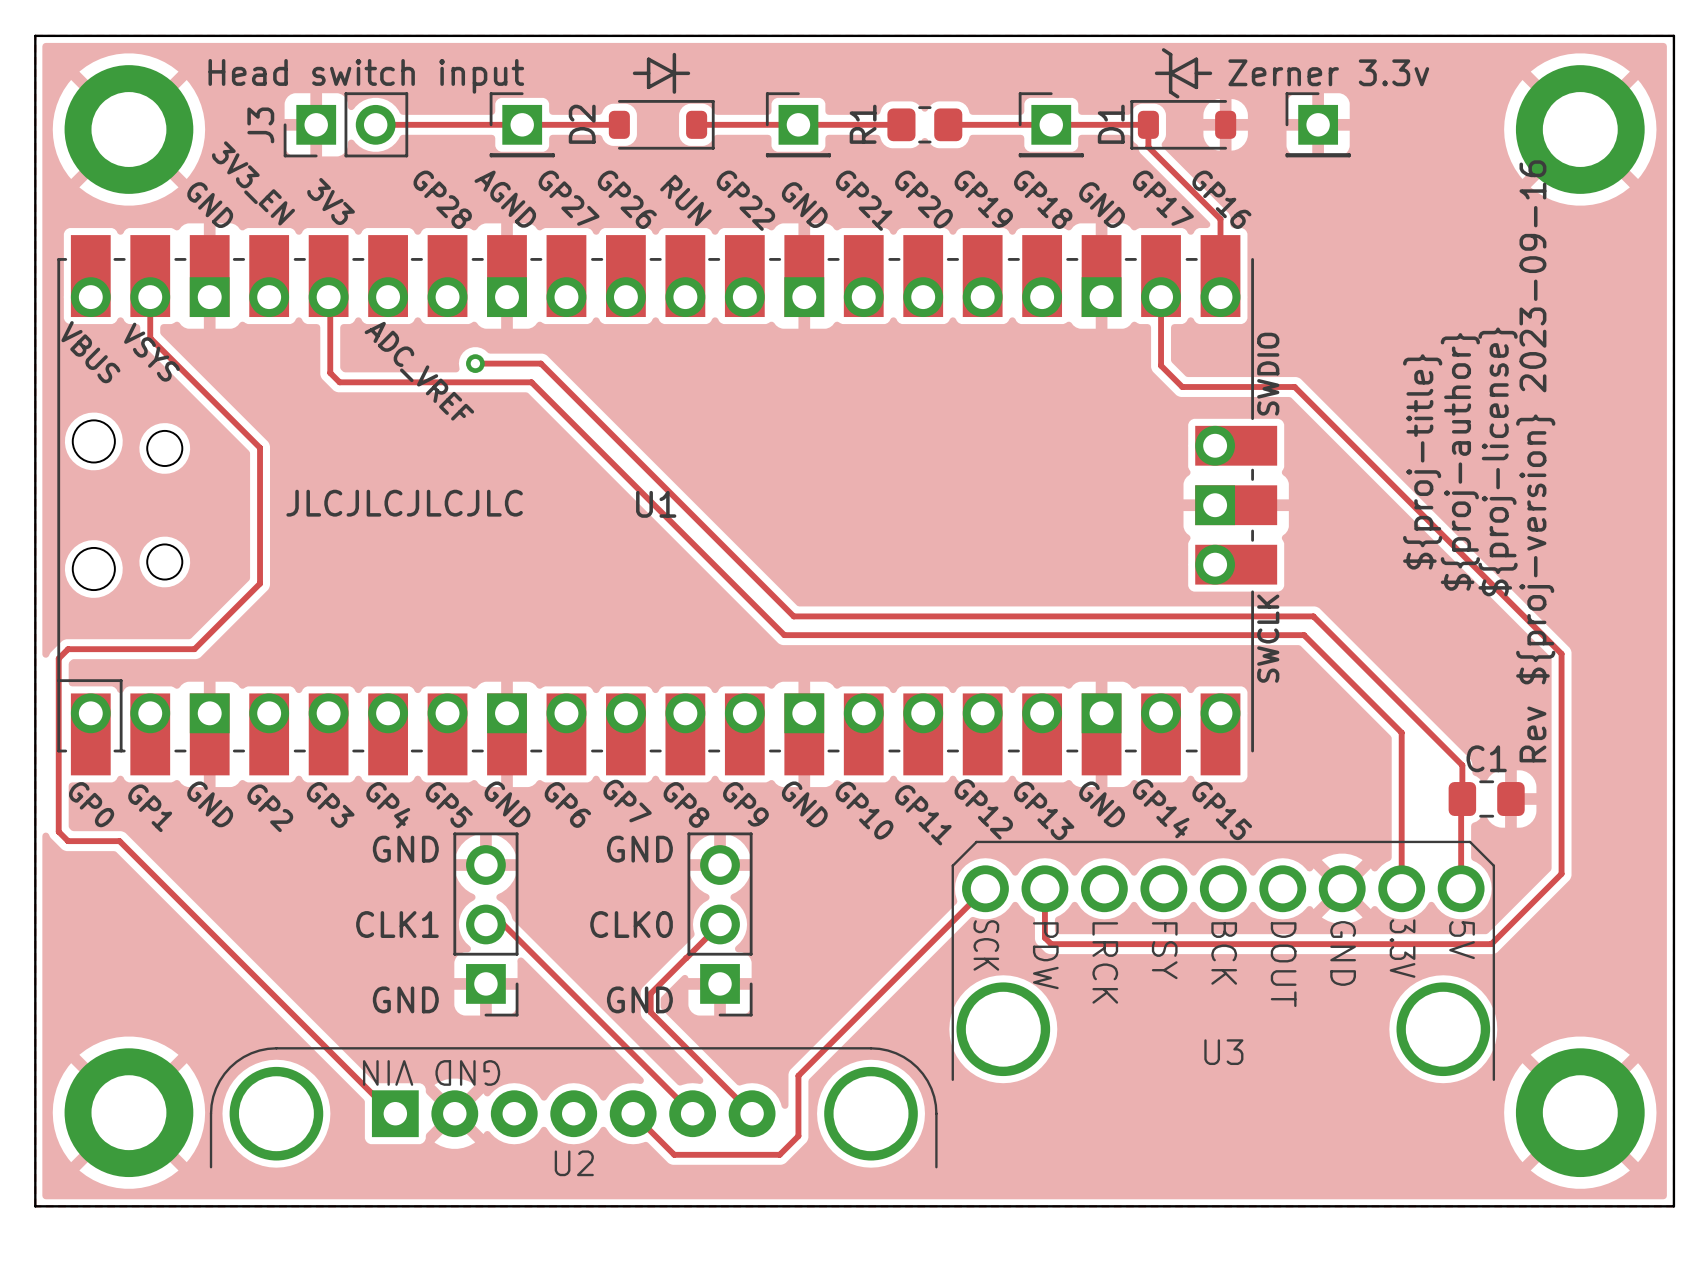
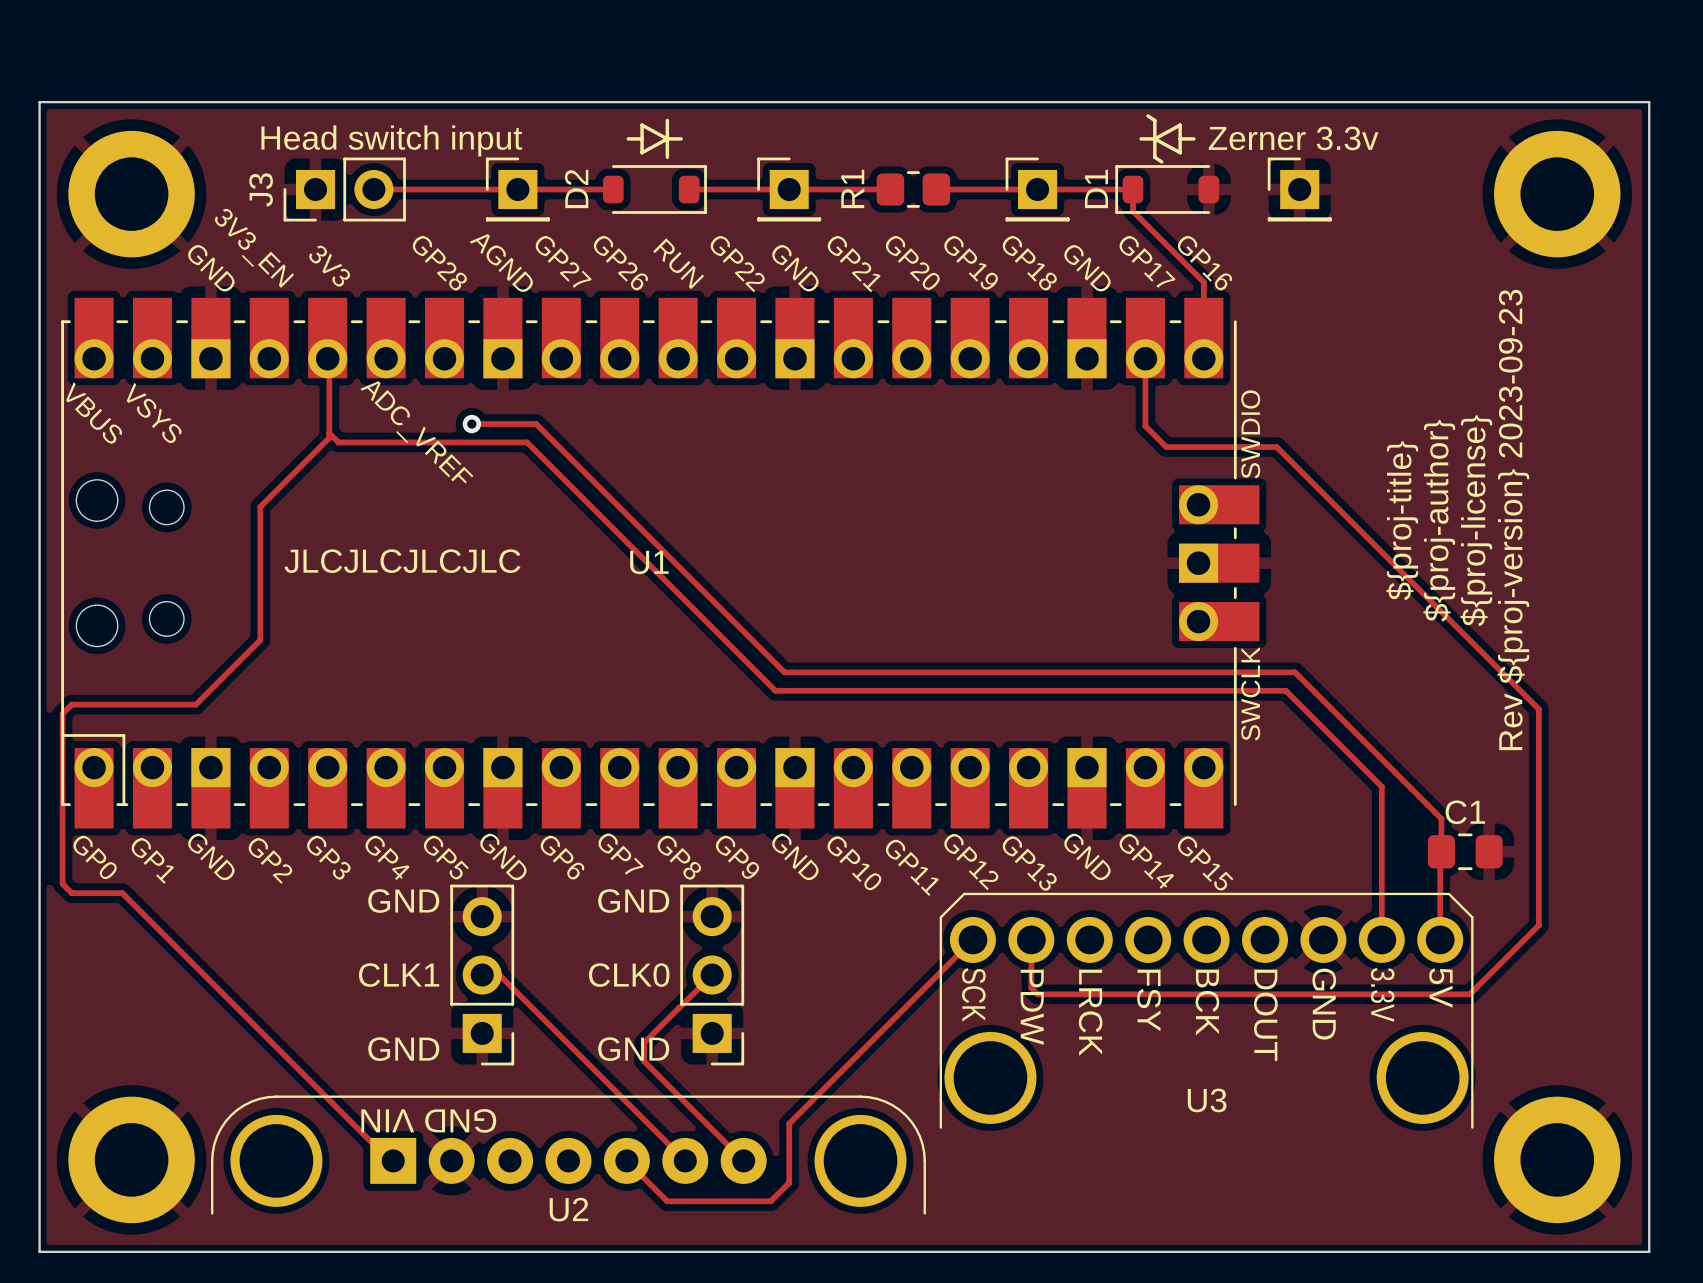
track: (150, 297) (150, 338) (260, 447) -> (329, 433) (329, 437) (260, 506)
text: Rev ${proj-version} 2023-09-16 (1535, 461) -> Rev ${proj-version} 2023-09-23 (1513, 520)

